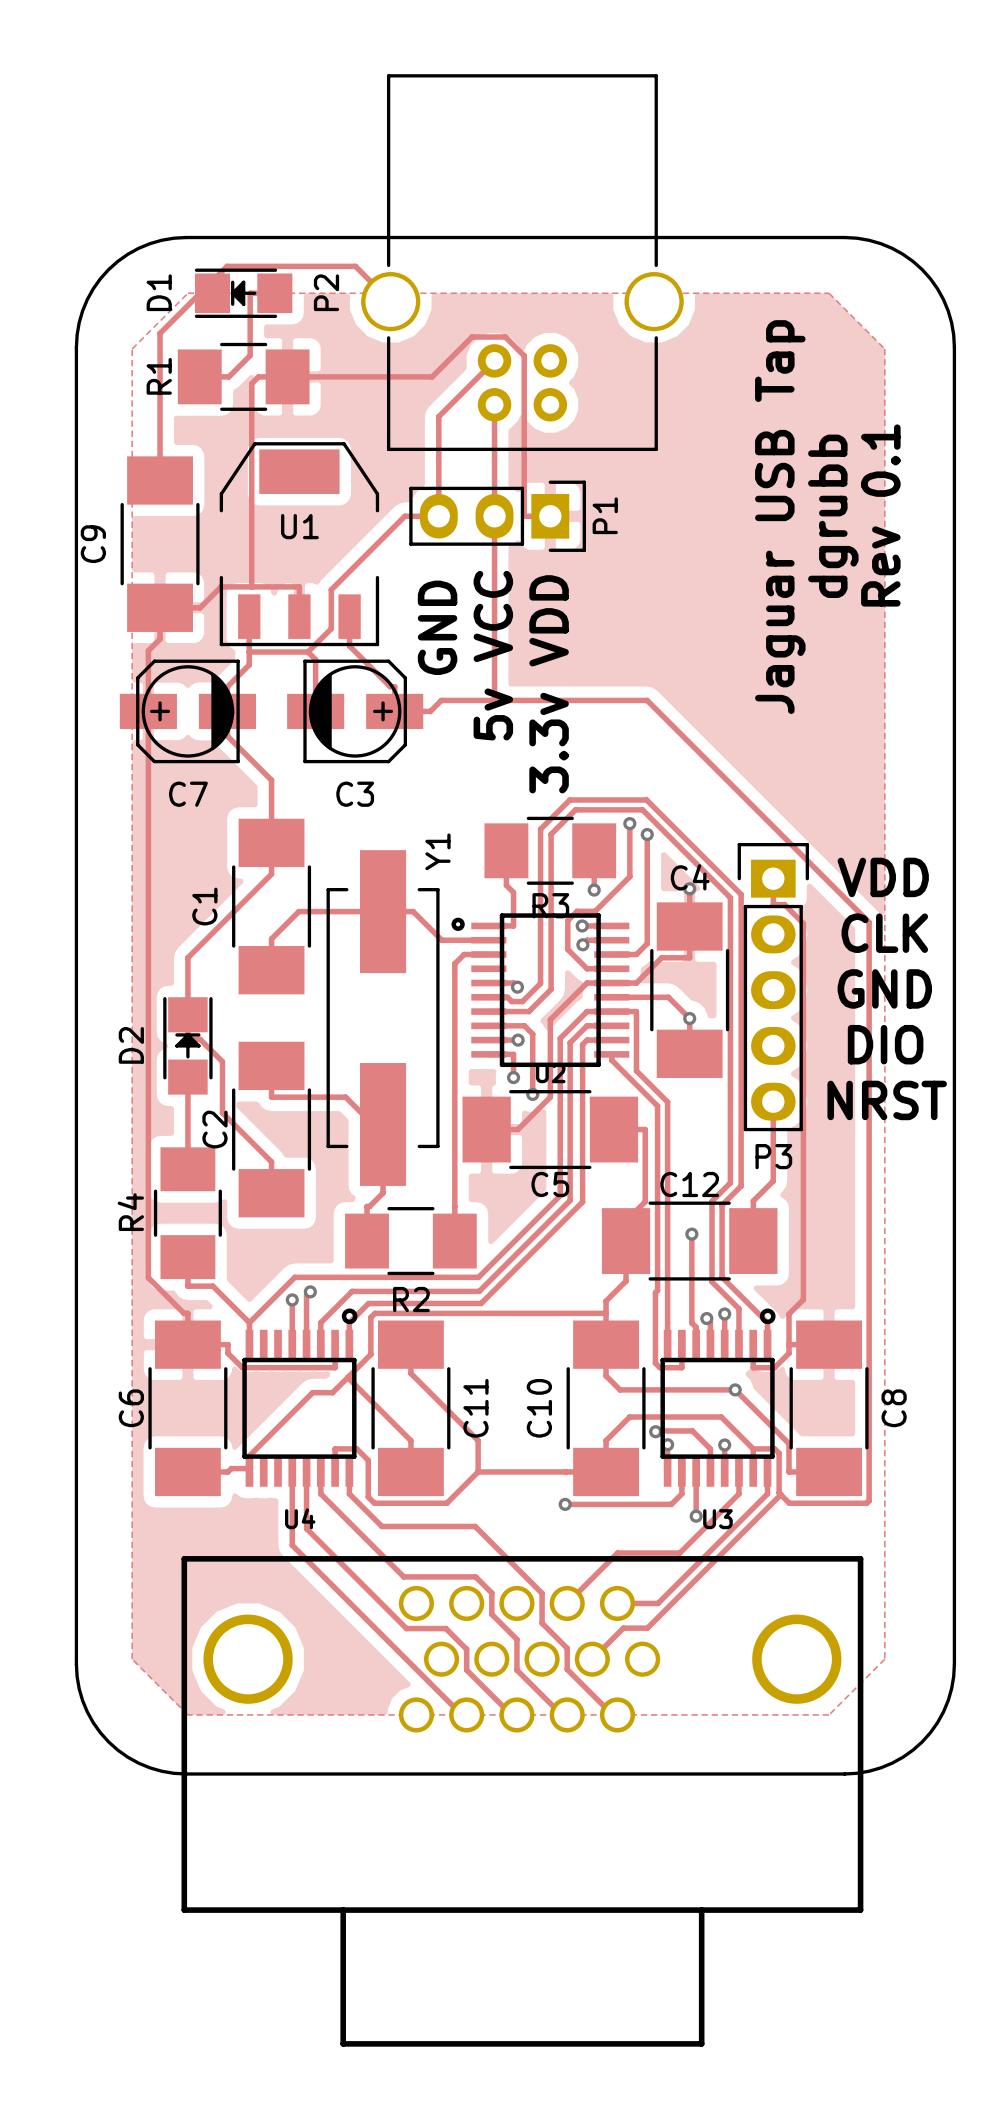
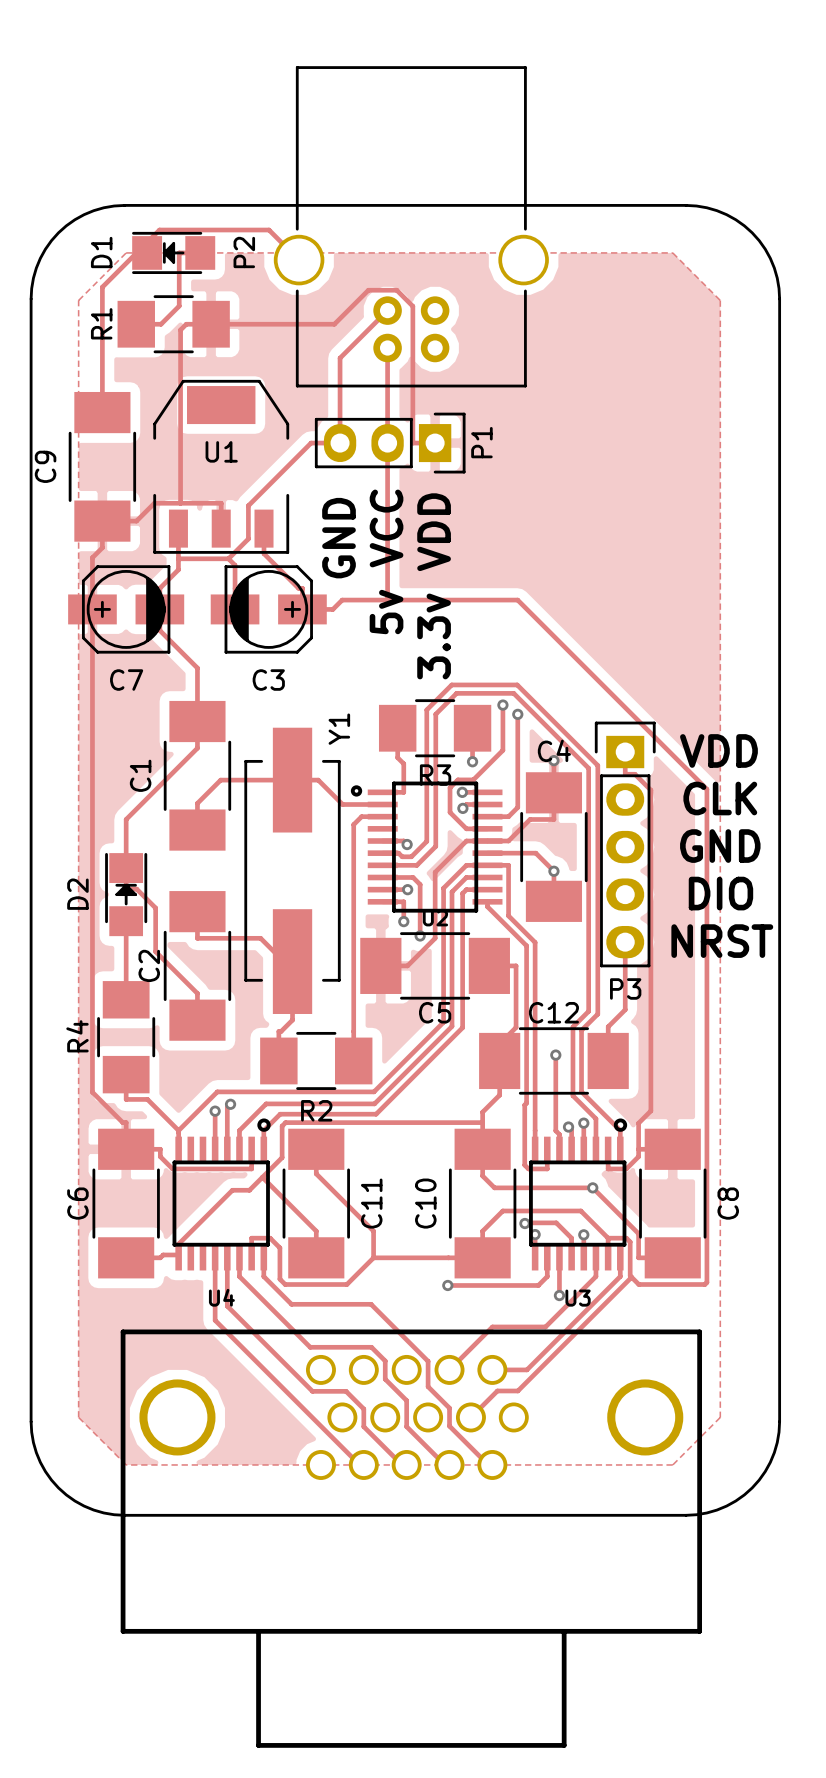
text: Rev 0.1 (880, 515) -> none
text: dgrubb (833, 516) -> none
text: Jaguar USB Tap (780, 517) -> none

